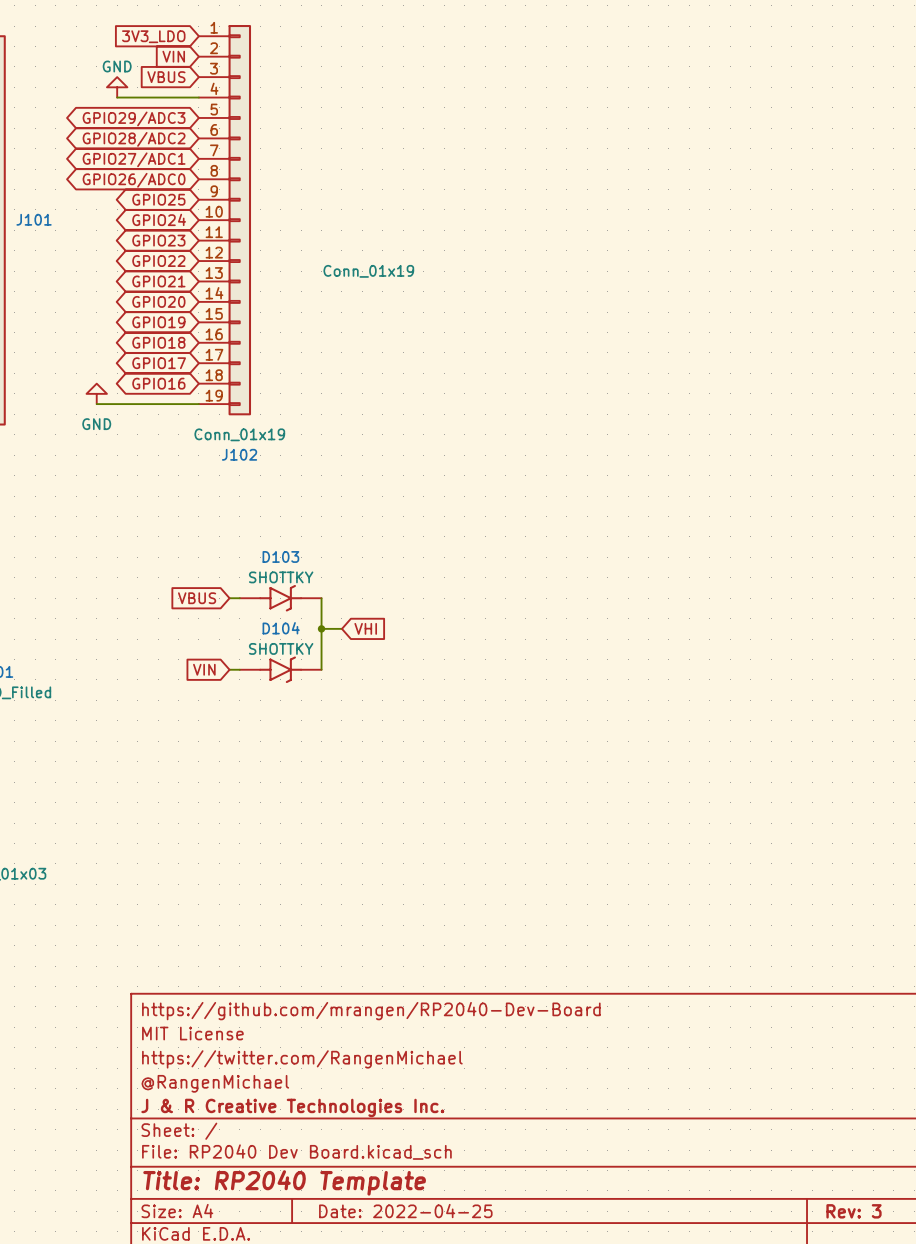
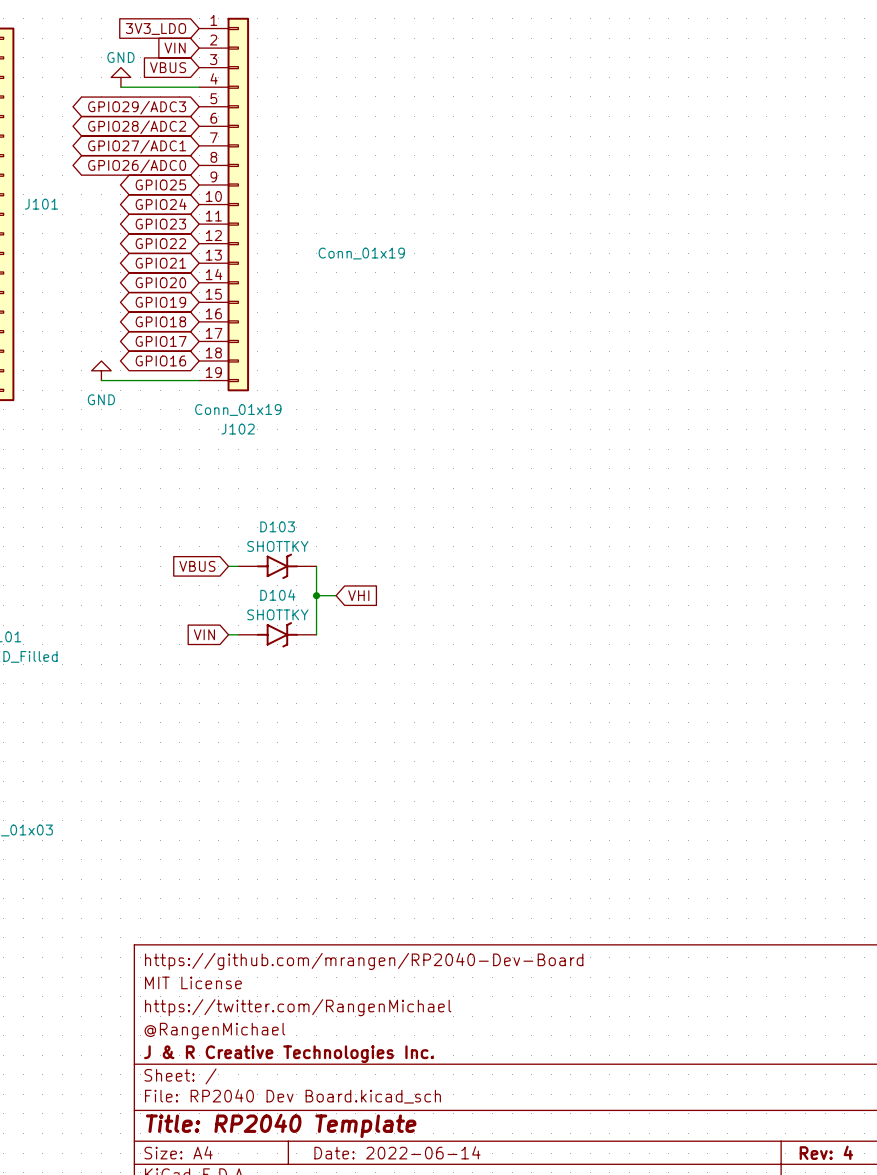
title block: Date: 2022-04-25 (405, 1211) -> Date: 2022-06-14 (397, 1152)
title block: Rev: 3 (854, 1211) -> Rev: 4 (826, 1152)

